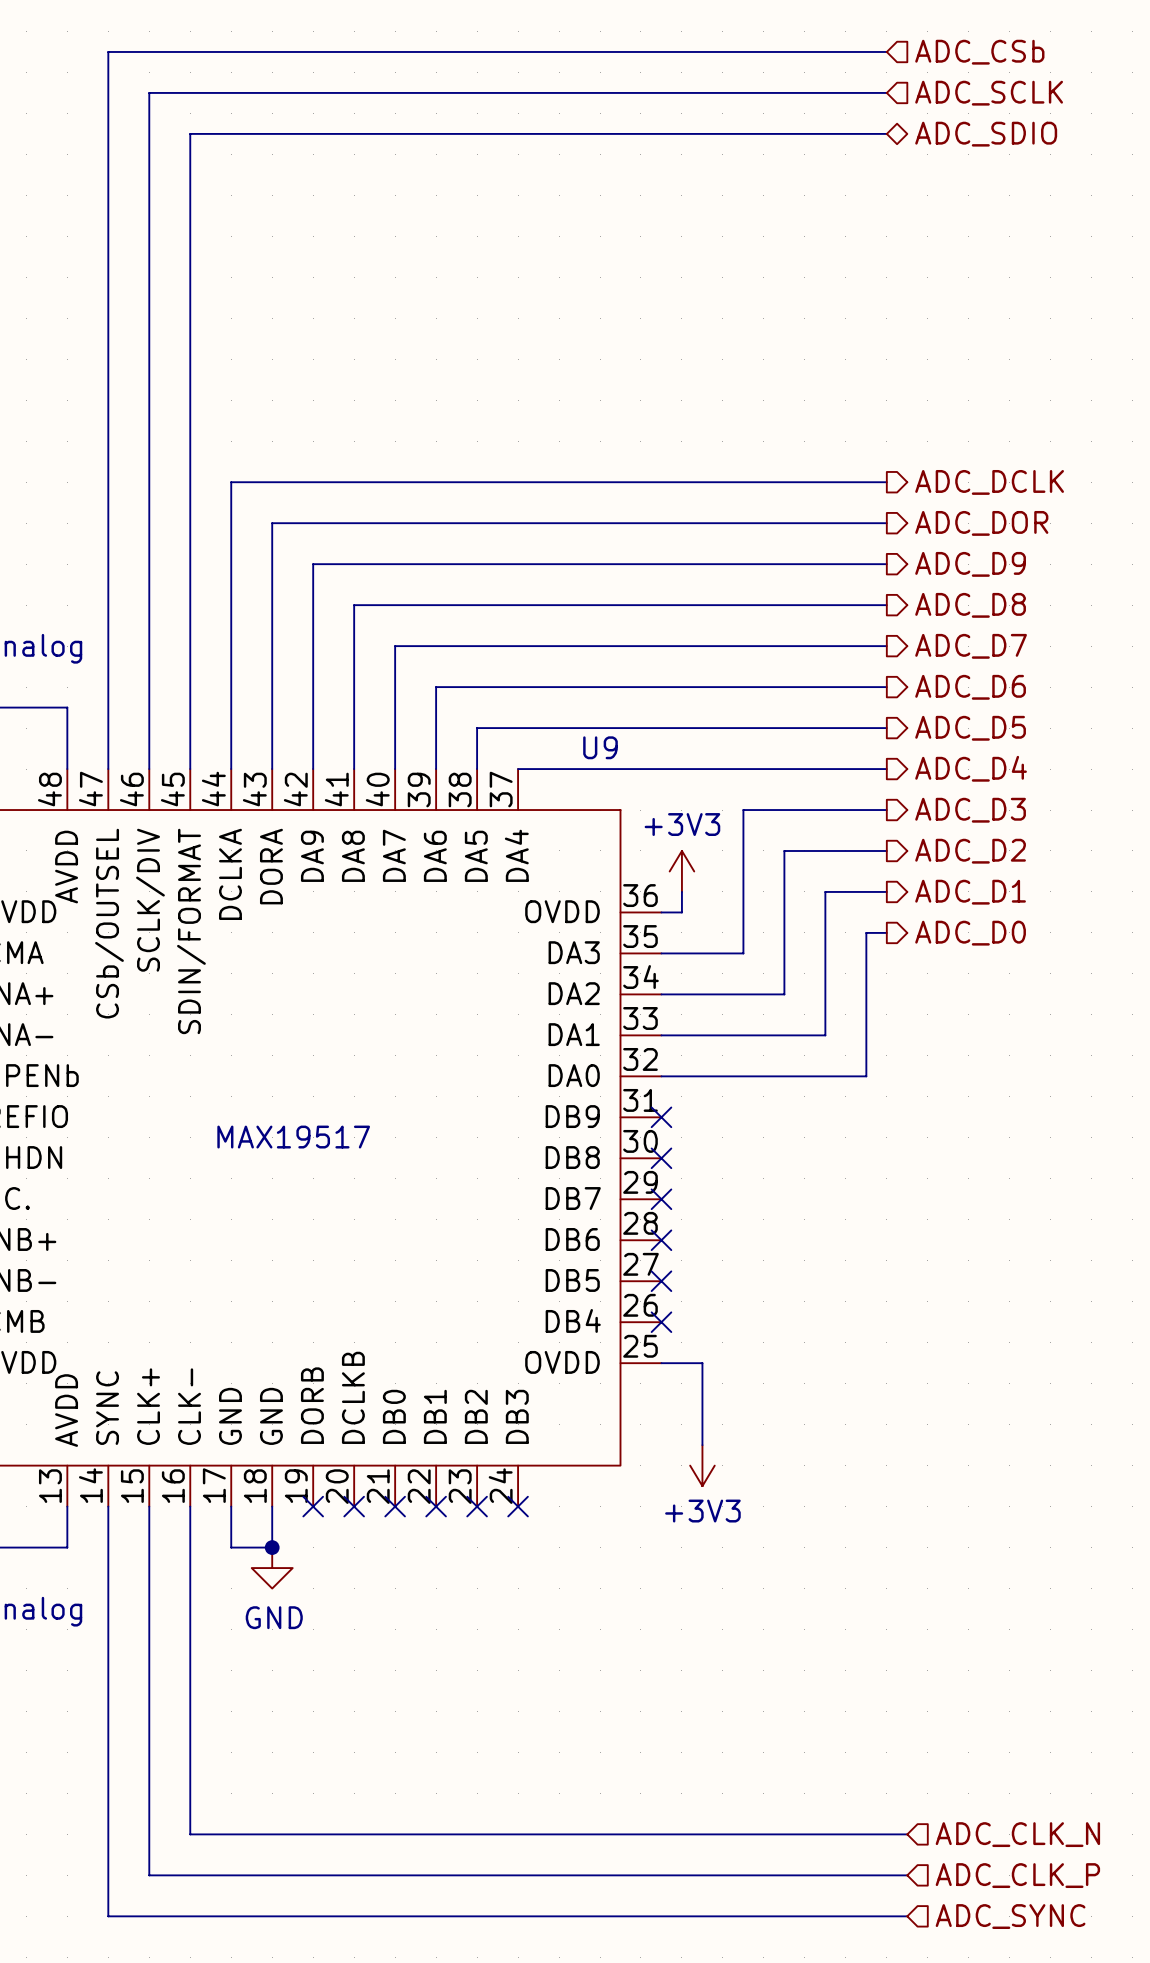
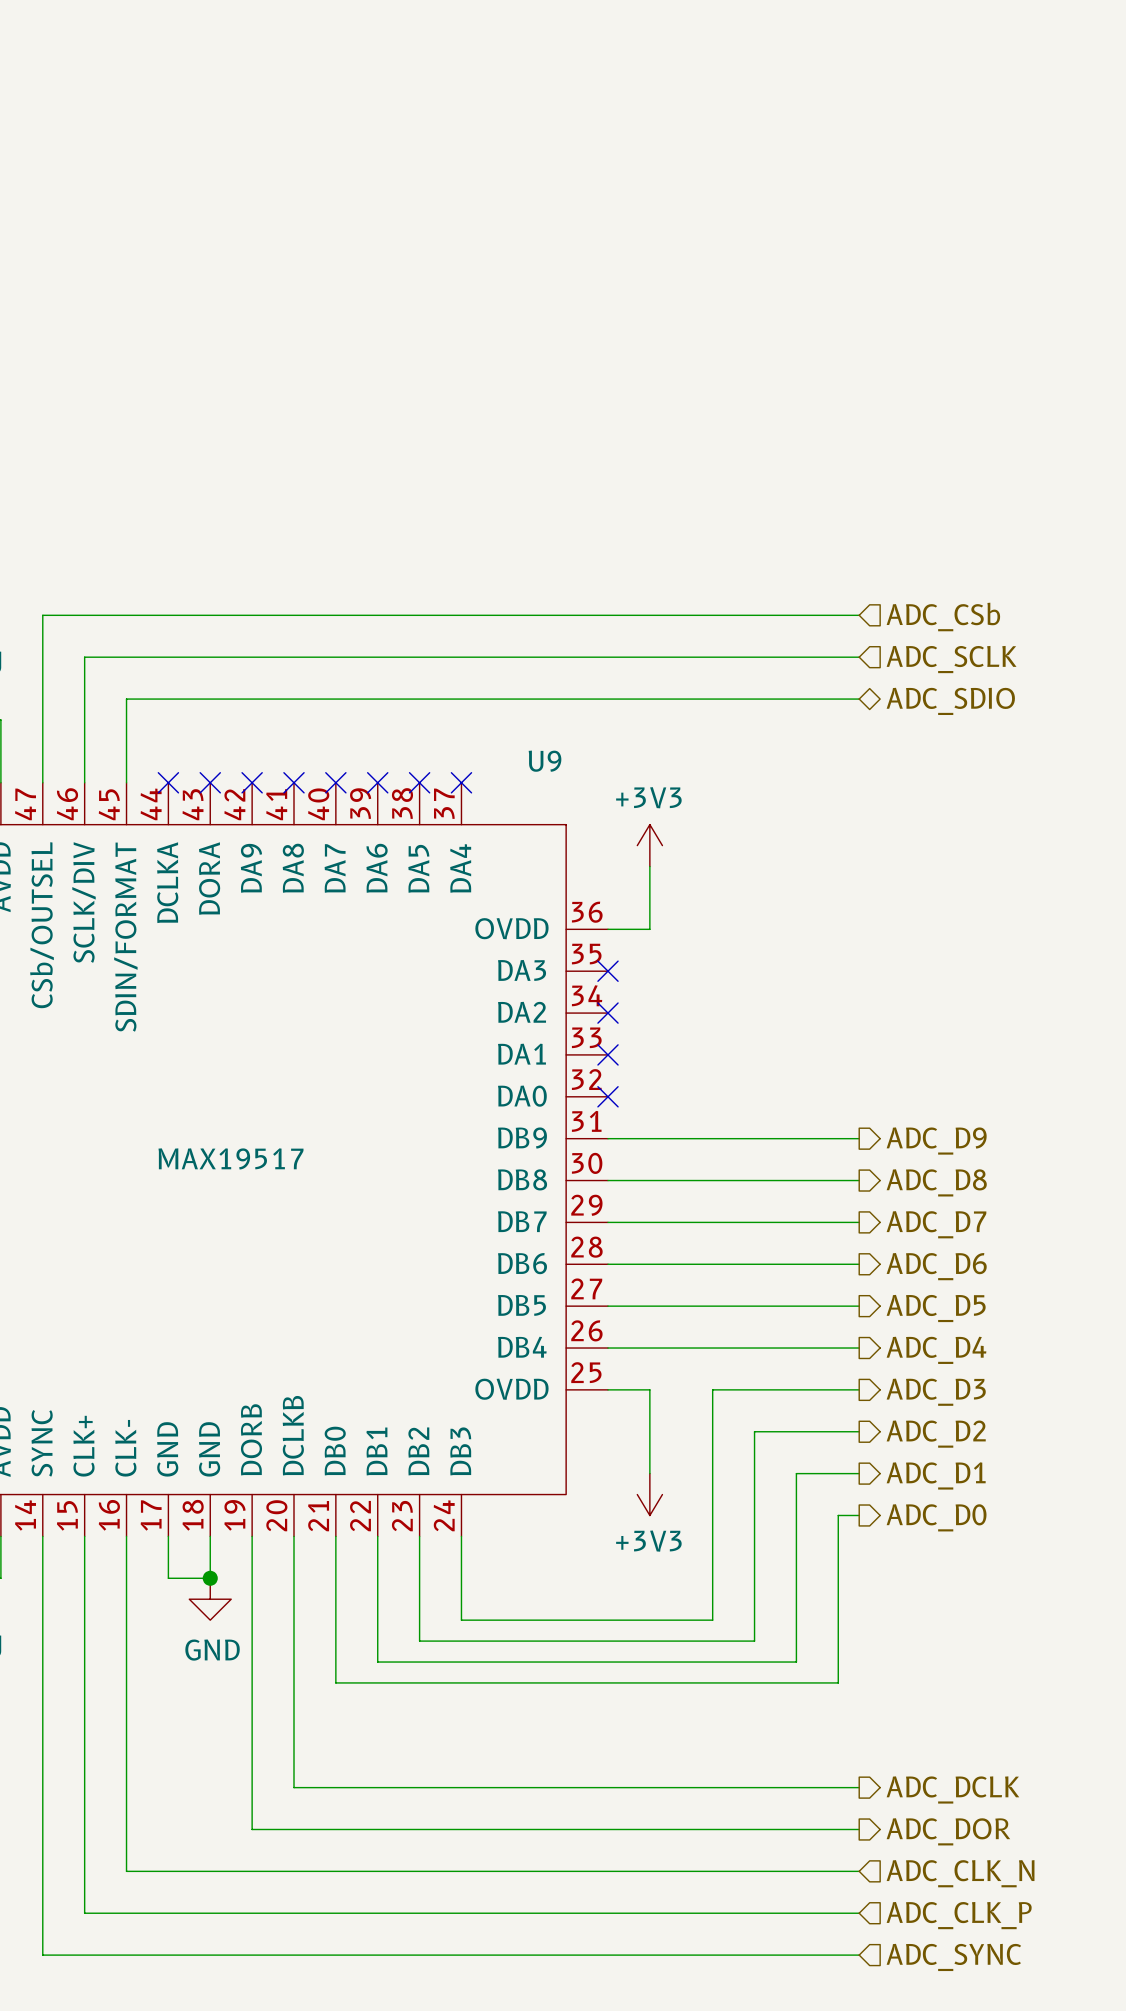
wire: (886, 51) (108, 51) (108, 605) -> none
hierarchical label: ADC_CSb (979, 52) -> none
wire: (886, 92) (149, 92) (149, 646) -> none
hierarchical label: ADC_SCLK (989, 93) -> none
wire: (886, 133) (190, 133) (190, 687) -> none
hierarchical label: ADC_SDIO (986, 134) -> none
wire: (886, 482) (231, 482) (231, 769) -> none
hierarchical label: ADC_DCLK (989, 482) -> none
wire: (886, 523) (272, 523) (272, 769) -> none
hierarchical label: ADC_DOR (981, 523) -> none
wire: (886, 564) (313, 564) (313, 769) -> none
hierarchical label: ADC_D9 (970, 564) -> none
wire: (354, 605) (354, 769) -> (293, 615) (42, 615)
wire: none -> (838, 615) (859, 615)
hierarchical label shape: output (970, 605) -> input (943, 616)
hierarchical label: ADC_D8 (970, 605) -> ADC_CSb (943, 616)
wire: (395, 646) (395, 769) -> (335, 657) (84, 657)
wire: none -> (838, 657) (859, 657)
hierarchical label: ADC_D7 (971, 646) -> none
hierarchical label: none -> ADC_SCLK (951, 659)
wire: (436, 687) (436, 769) -> (377, 699) (126, 699)
wire: none -> (838, 699) (859, 699)
hierarchical label shape: output (970, 687) -> bidirectional (950, 701)
hierarchical label: ADC_D6 (970, 687) -> ADC_SDIO (950, 701)
wire: (886, 728) (477, 728) (477, 769) -> none
hierarchical label: ADC_D5 (970, 728) -> none
hierarchical label: ADC_D4 (971, 768) -> none
no-connect mark: none -> (168, 782)
no-connect mark: none -> (210, 782)
no-connect mark: none -> (252, 782)
no-connect mark: none -> (293, 782)
no-connect mark: none -> (335, 782)
no-connect mark: none -> (377, 782)
no-connect mark: none -> (419, 782)
wire: (518, 769) (886, 769) -> none
no-connect mark: none -> (461, 782)
wire: (886, 810) (743, 810) (743, 953) (661, 953) -> none
hierarchical label: ADC_D3 (970, 810) -> none
wire: (886, 850) (784, 850) (784, 994) (661, 994) -> none
hierarchical label: ADC_D2 (970, 851) -> none
power symbol position: +3V3 (681, 871) -> +3V3 (649, 845)
wire: (681, 891) (681, 912) -> (649, 866) (649, 929) (628, 929)
wire: (886, 891) (825, 891) (825, 1035) (661, 1035) -> none
hierarchical label: ADC_D1 (970, 892) -> none
wire: (886, 932) (866, 932) (866, 1076) (661, 1076) -> none
hierarchical label: ADC_D0 (970, 933) -> none
no-connect mark: none -> (608, 971)
no-connect mark: none -> (608, 1013)
no-connect mark: none -> (608, 1054)
no-connect mark: none -> (608, 1096)
wire: none -> (608, 1138) (859, 1138)
no-connect mark: (661, 1117) -> none
hierarchical label: none -> ADC_D9 (936, 1141)
wire: none -> (608, 1180) (859, 1180)
no-connect mark: (661, 1158) -> none
hierarchical label: none -> ADC_D8 (936, 1182)
wire: none -> (608, 1222) (859, 1222)
no-connect mark: (661, 1199) -> none
hierarchical label: none -> ADC_D7 (936, 1224)
wire: none -> (608, 1264) (859, 1264)
no-connect mark: (661, 1240) -> none
hierarchical label: none -> ADC_D6 (936, 1266)
wire: none -> (608, 1306) (859, 1306)
no-connect mark: (661, 1281) -> none
hierarchical label: none -> ADC_D5 (936, 1308)
hierarchical label: none -> ADC_D4 (936, 1350)
wire: none -> (608, 1348) (859, 1348)
no-connect mark: (661, 1322) -> none
wire: none -> (859, 1389) (712, 1389) (712, 1620) (461, 1620) (461, 1536)
hierarchical label: none -> ADC_D3 (936, 1392)
wire: none -> (859, 1431) (754, 1431) (754, 1641) (419, 1641) (419, 1536)
hierarchical label: none -> ADC_D2 (936, 1434)
wire: none -> (859, 1473) (796, 1473) (796, 1662) (377, 1662) (377, 1536)
hierarchical label: none -> ADC_D1 (936, 1475)
wire: none -> (859, 1515) (838, 1515) (838, 1682) (335, 1682) (335, 1536)
hierarchical label: none -> ADC_D0 (936, 1517)
wire: none -> (252, 1536) (252, 1829) (859, 1829)
no-connect mark: (313, 1506) -> none
wire: none -> (293, 1536) (293, 1787) (859, 1787)
no-connect mark: (354, 1506) -> none
no-connect mark: (395, 1506) -> none
no-connect mark: (436, 1506) -> none
no-connect mark: (477, 1506) -> none
no-connect mark: (518, 1506) -> none
hierarchical label: none -> ADC_DCLK (952, 1789)
hierarchical label: none -> ADC_DOR (948, 1831)

